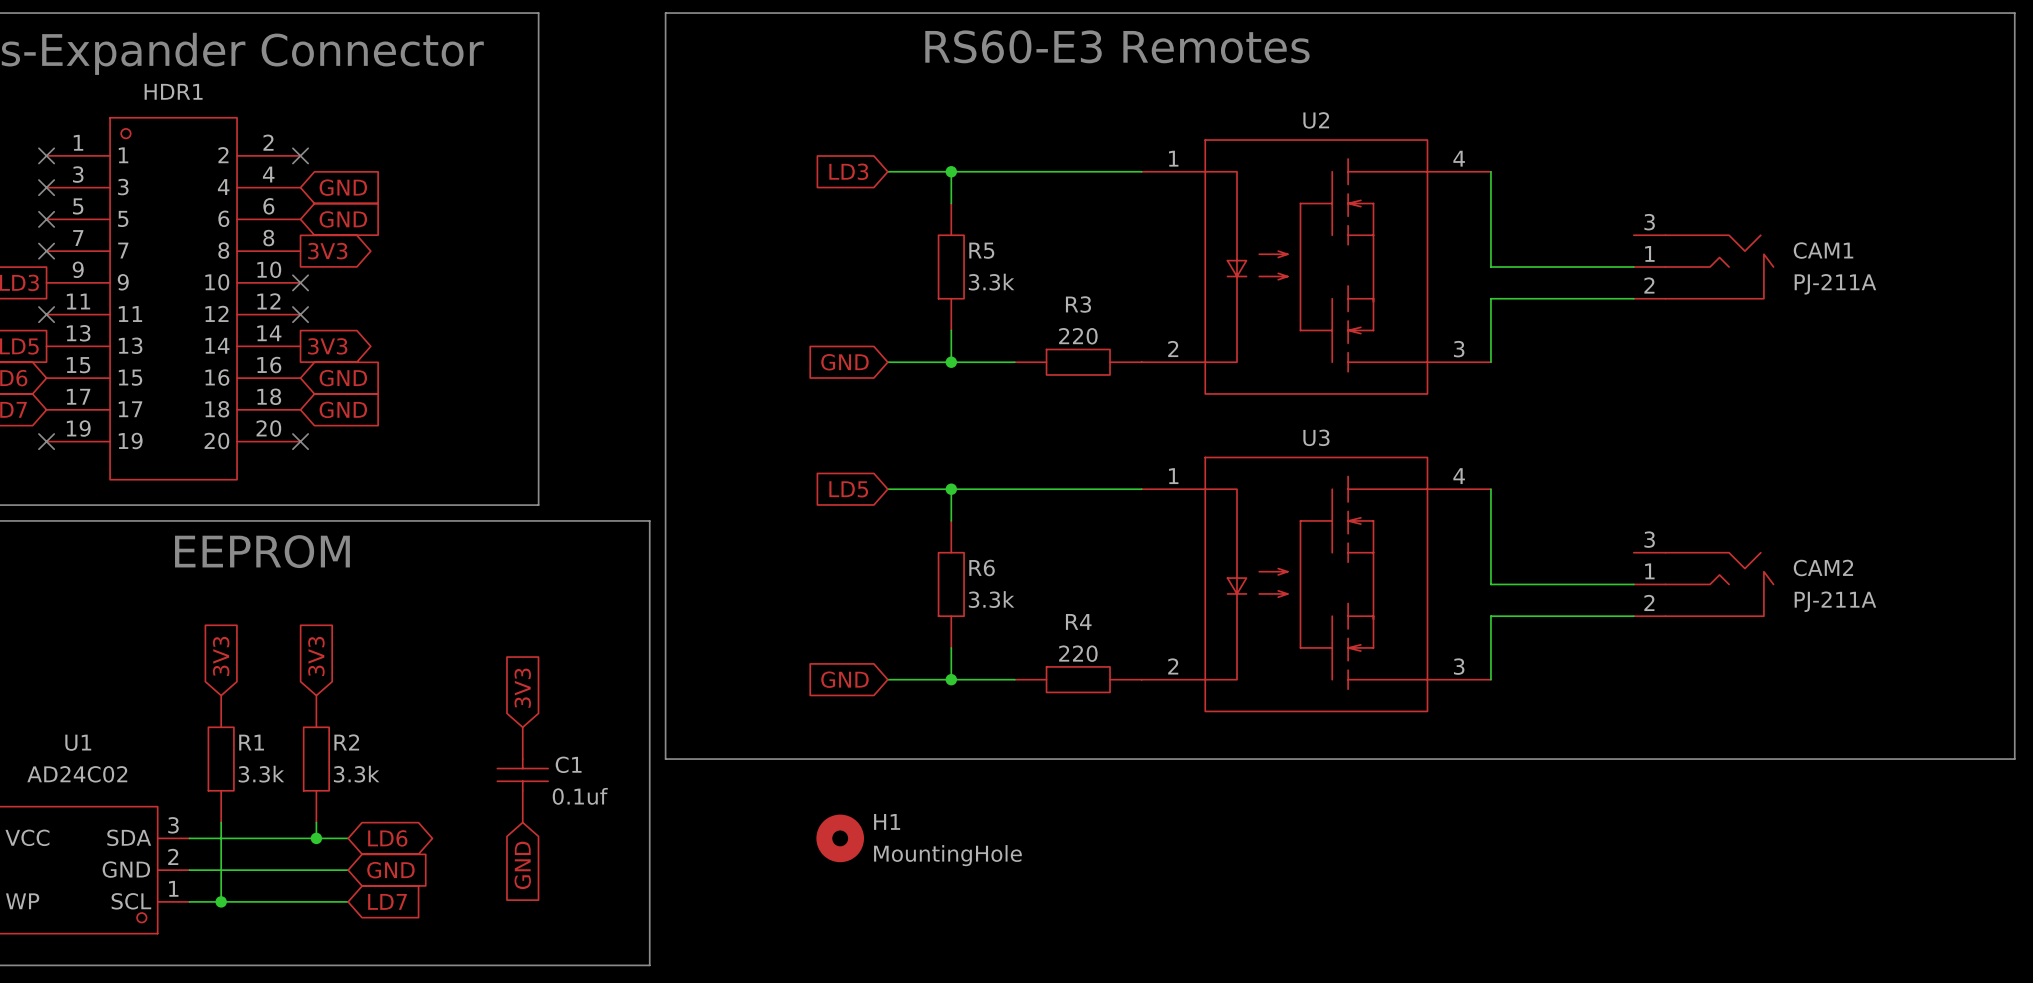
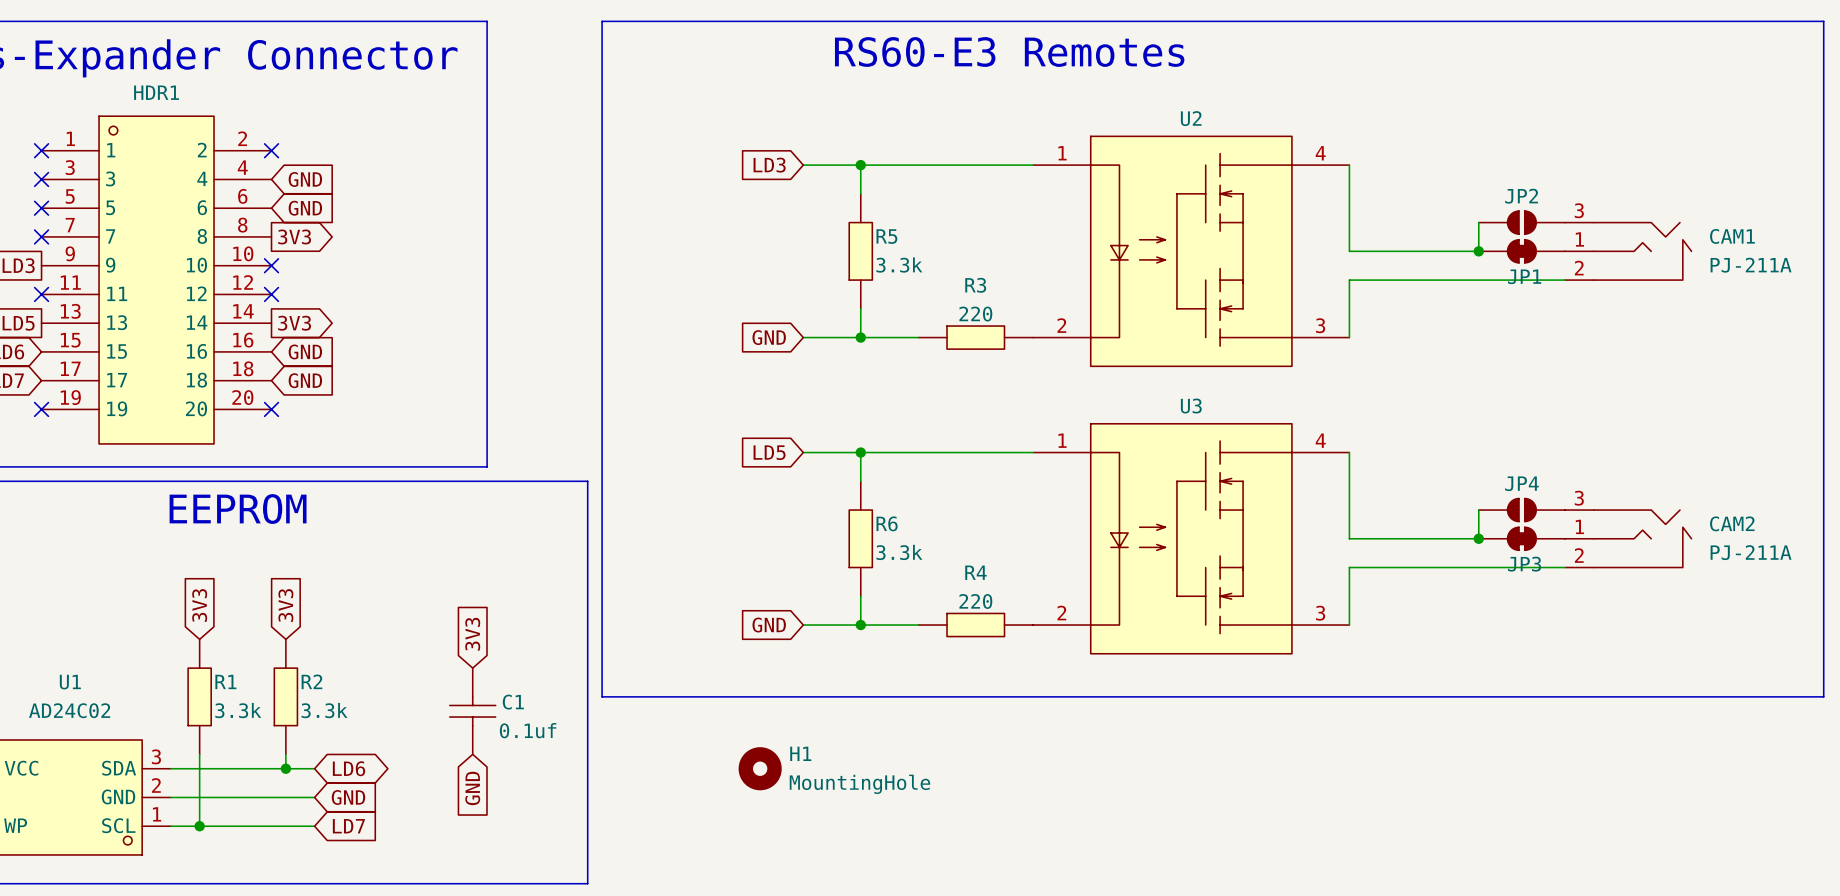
wire: none -> (1478, 222) (1478, 251)
JP2: none -> (1521, 222)
junction: none -> (1478, 251)
JP1: none -> (1521, 251)
CAM1 position: (1703, 267) -> (1628, 251)
wire: none -> (1478, 510) (1478, 538)
JP4: none -> (1521, 510)
junction: none -> (1478, 538)
JP3: none -> (1521, 538)
CAM2 position: (1703, 584) -> (1628, 538)

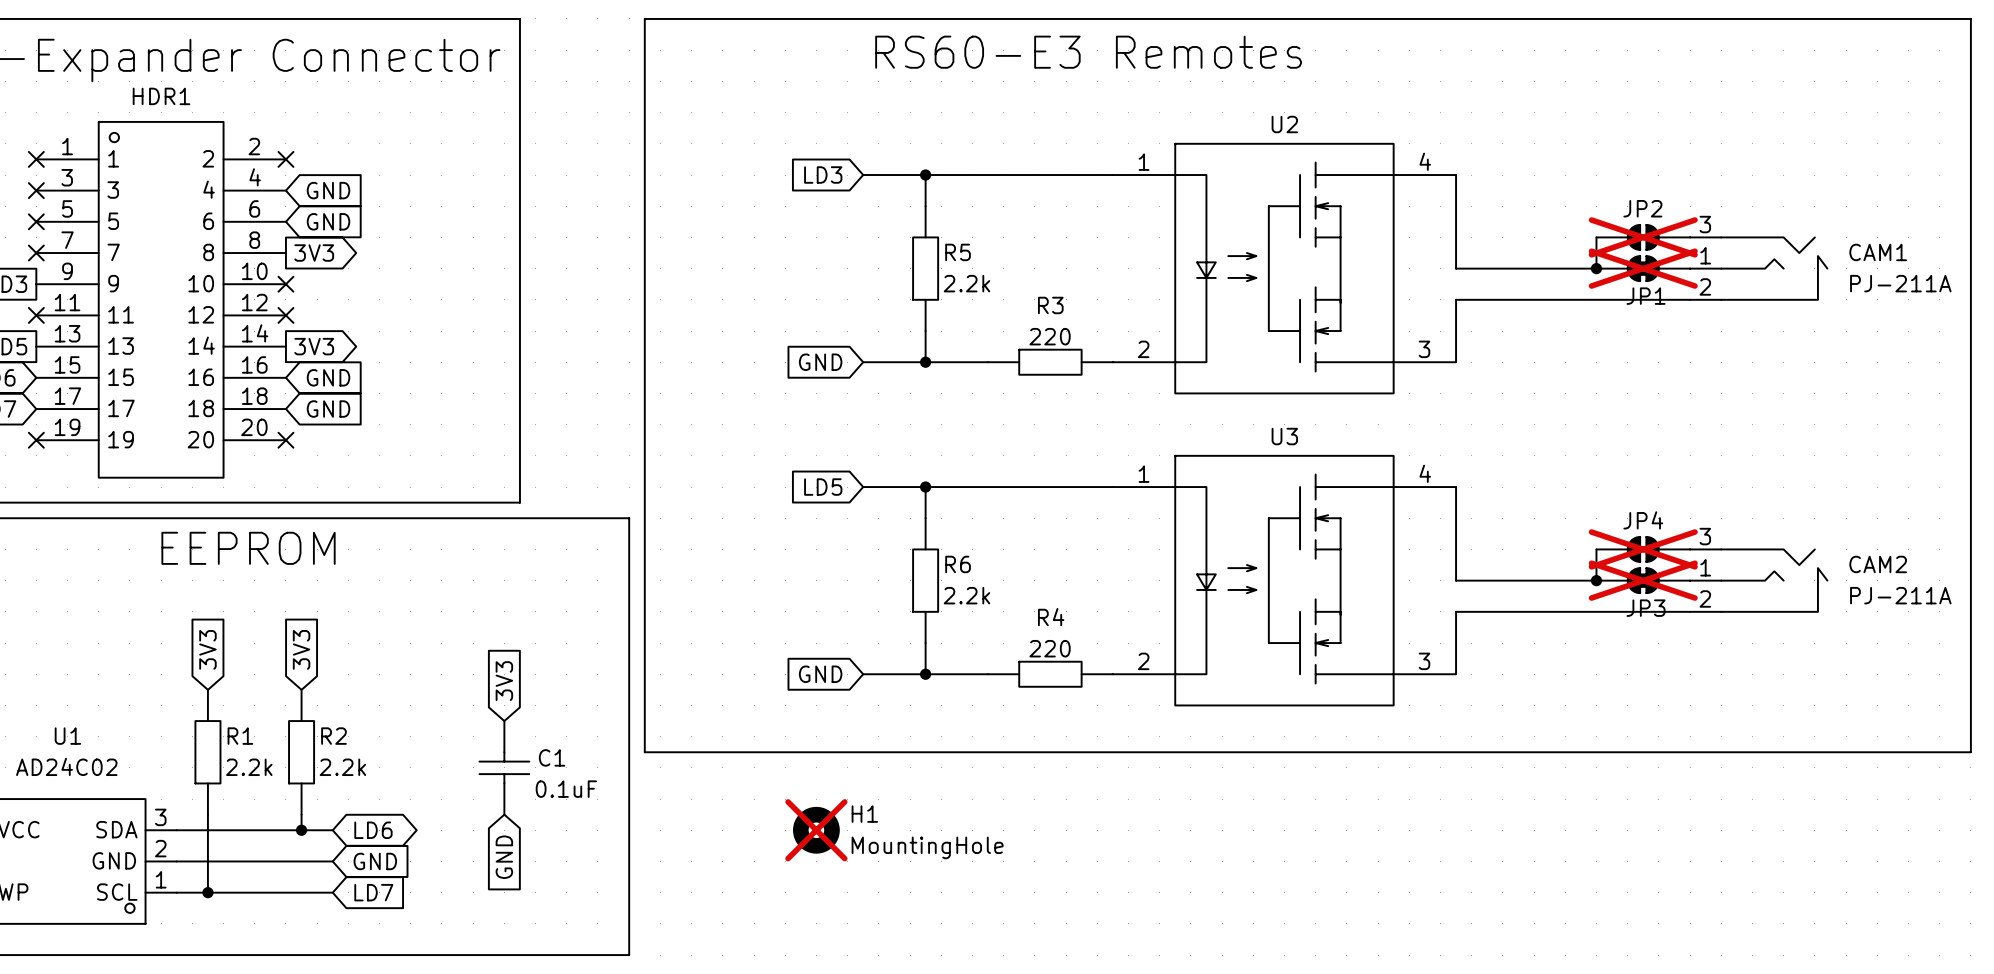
JP2 do-not-place cross: none -> (1643, 237)
JP1 do-not-place cross: none -> (1643, 268)
R5 value: 3.3k (899, 265) -> 2.2k (966, 283)
JP4 do-not-place cross: none -> (1643, 549)
JP3 do-not-place cross: none -> (1643, 580)
R6 value: 3.3k (899, 552) -> 2.2k (966, 595)
R1 value: 3.3k (238, 710) -> 2.2k (249, 767)
R2 value: 3.3k (324, 710) -> 2.2k (342, 767)
C1 value: 0.1uf (528, 730) -> 0.1uF (566, 789)
H1 do-not-place cross: none -> (816, 830)

